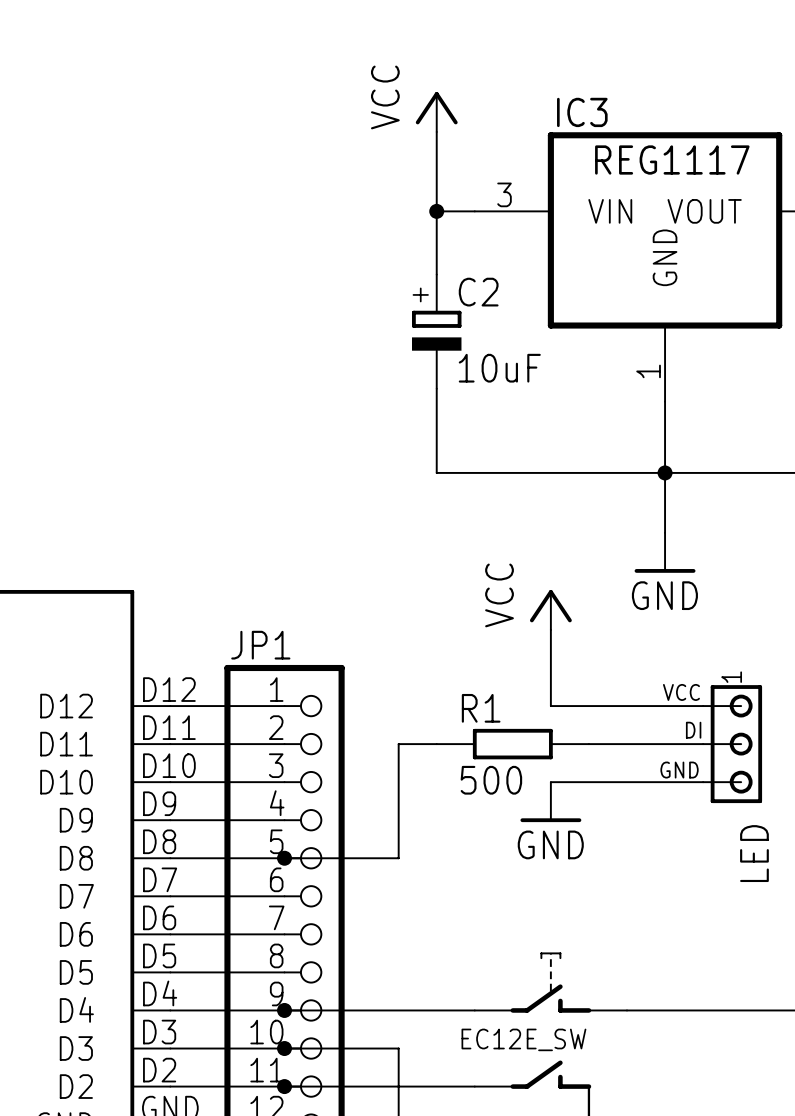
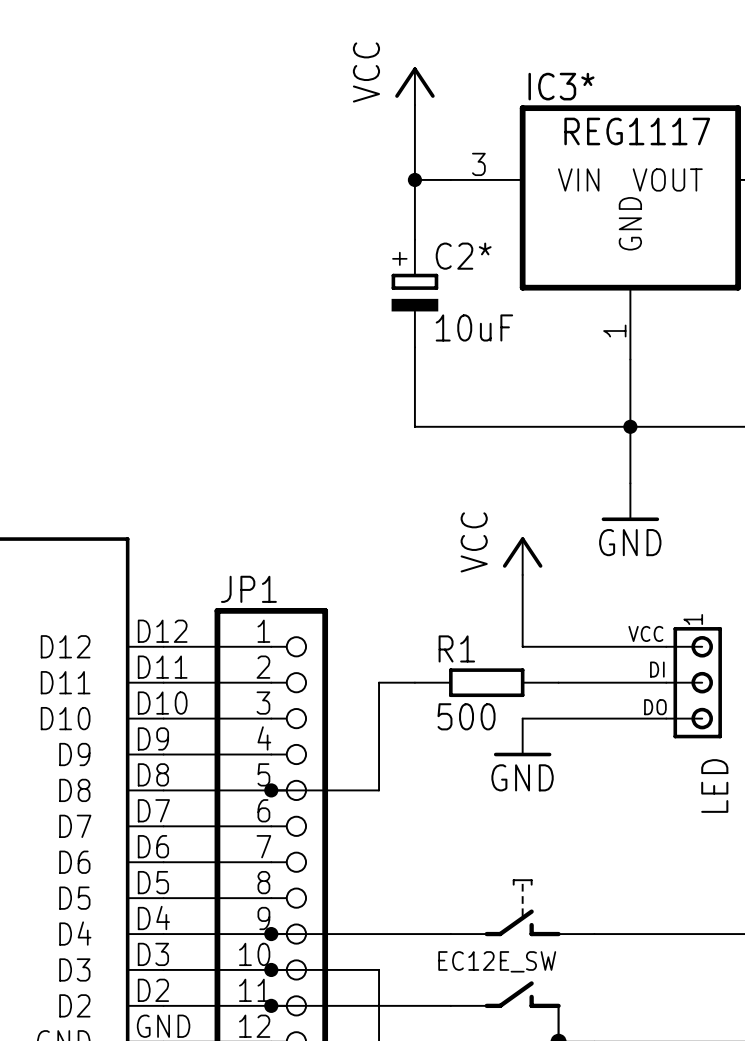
IC3 name: IC3 (582, 112) -> IC3* (561, 86)
C2 name: C2 (478, 292) -> C2* (463, 256)
text: GND (679, 770) -> none
text: none -> DO (655, 707)

